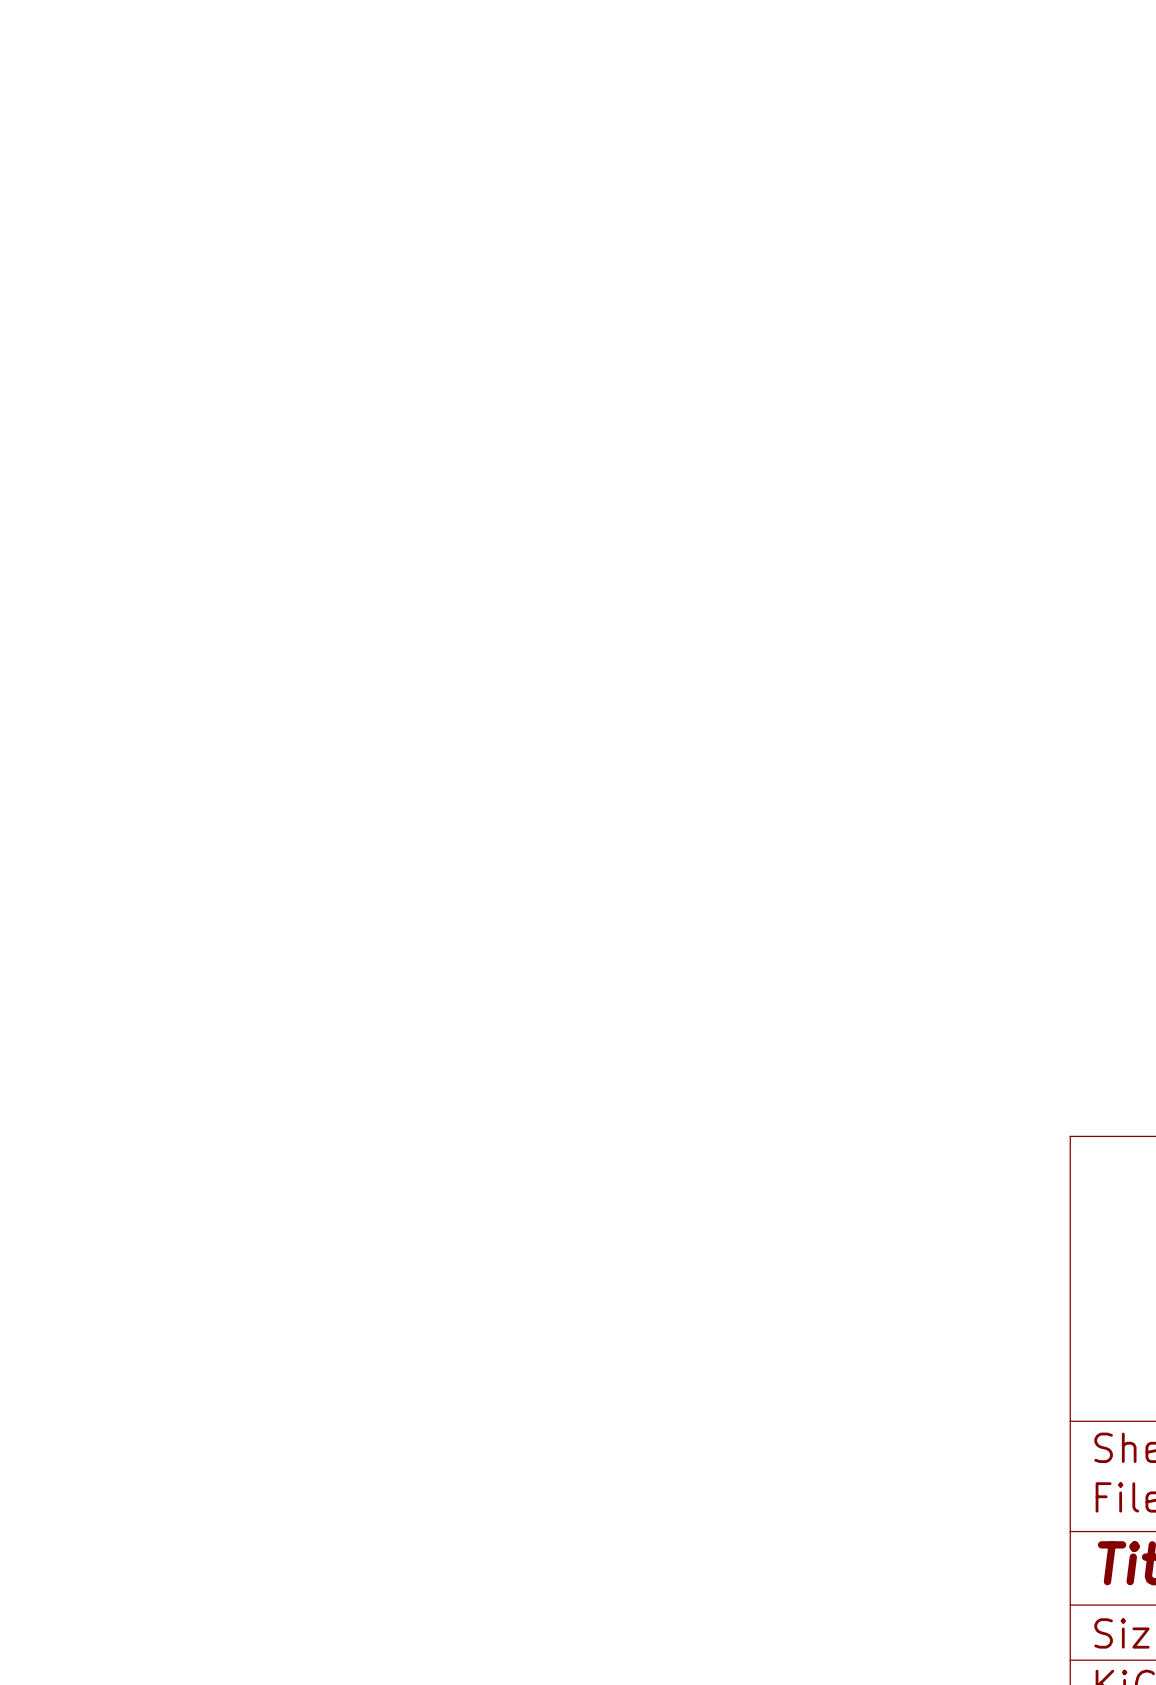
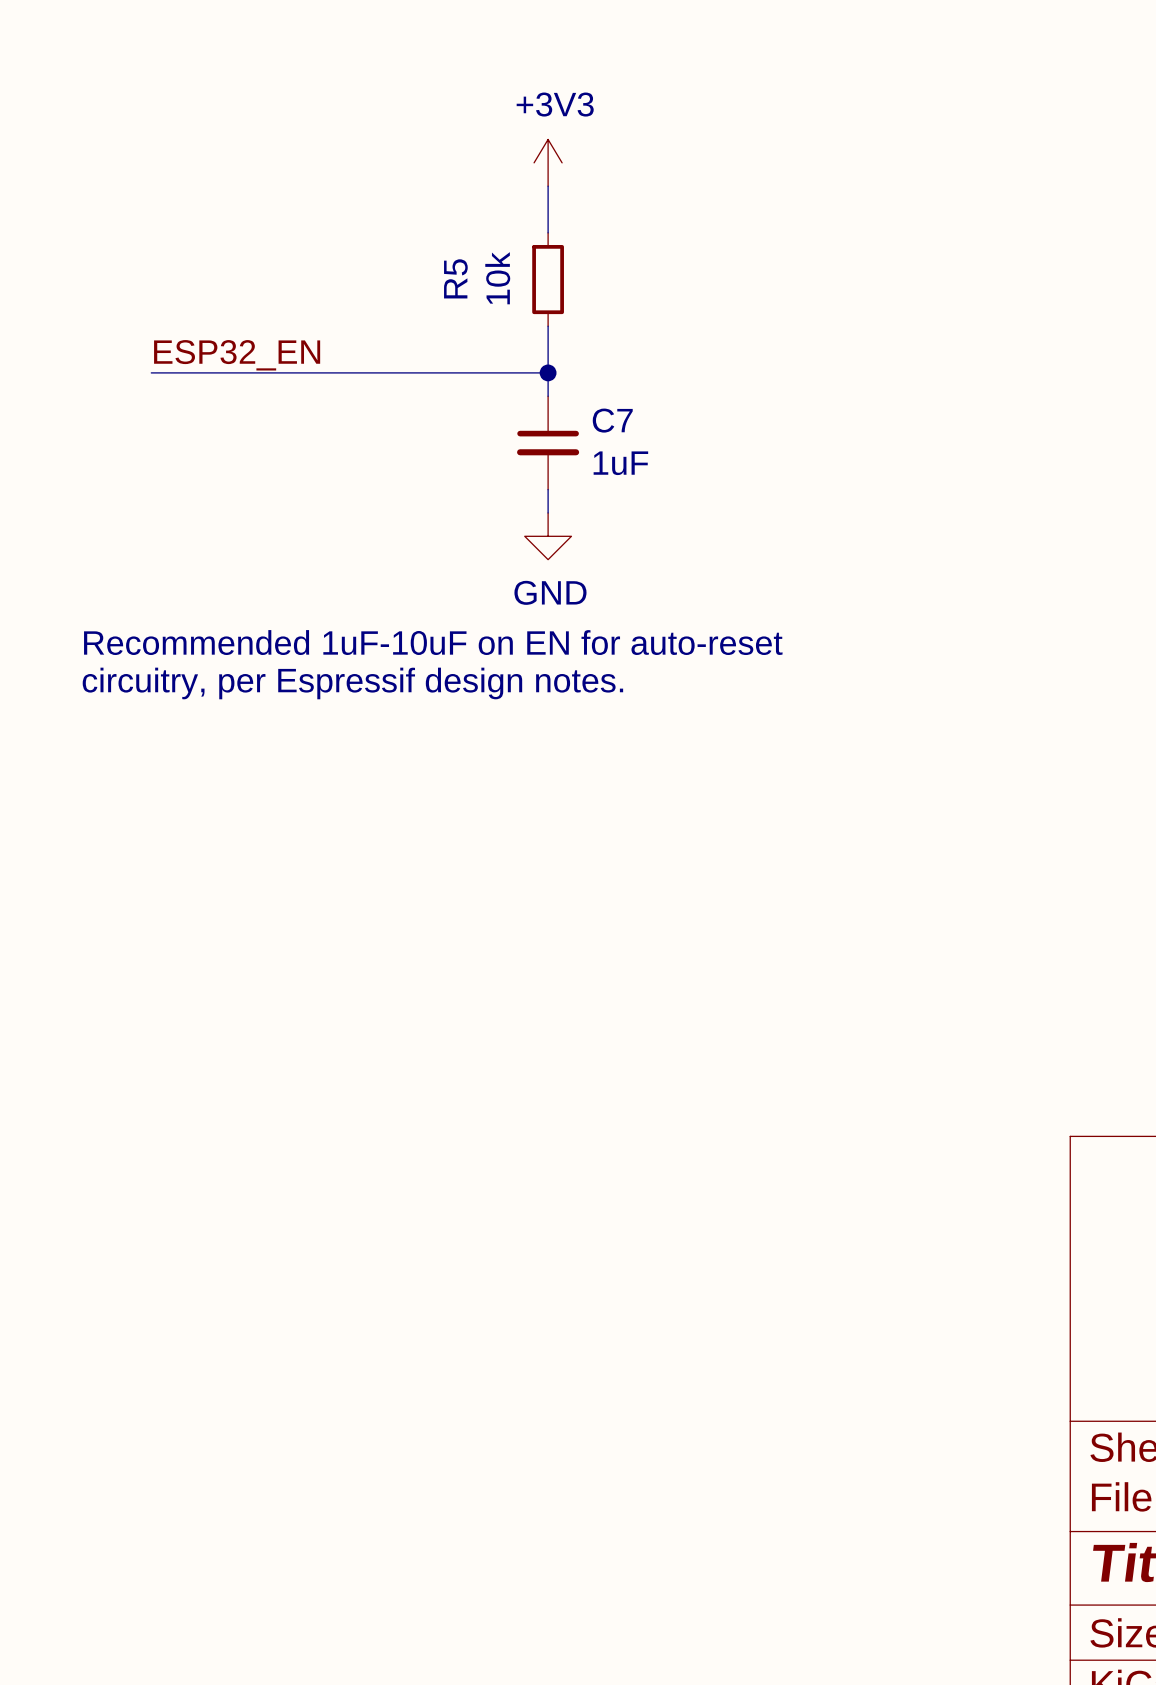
power symbol: none -> +3V3 (548, 162)
wire: none -> (548, 186) (548, 232)
R5: none -> 10k (548, 279)
wire: none -> (548, 326) (548, 396)
label: none -> ESP32_EN (237, 355)
wire: none -> (151, 372) (548, 372)
junction: none -> (548, 372)
C7: none -> 1uF (548, 442)
wire: none -> (548, 489) (548, 512)
power symbol: none -> GND (548, 536)
text: none -> Recommended 1uF-10uF on EN for auto-reset (433, 642)
text: none -> circuitry, per Espressif design notes. (352, 683)

